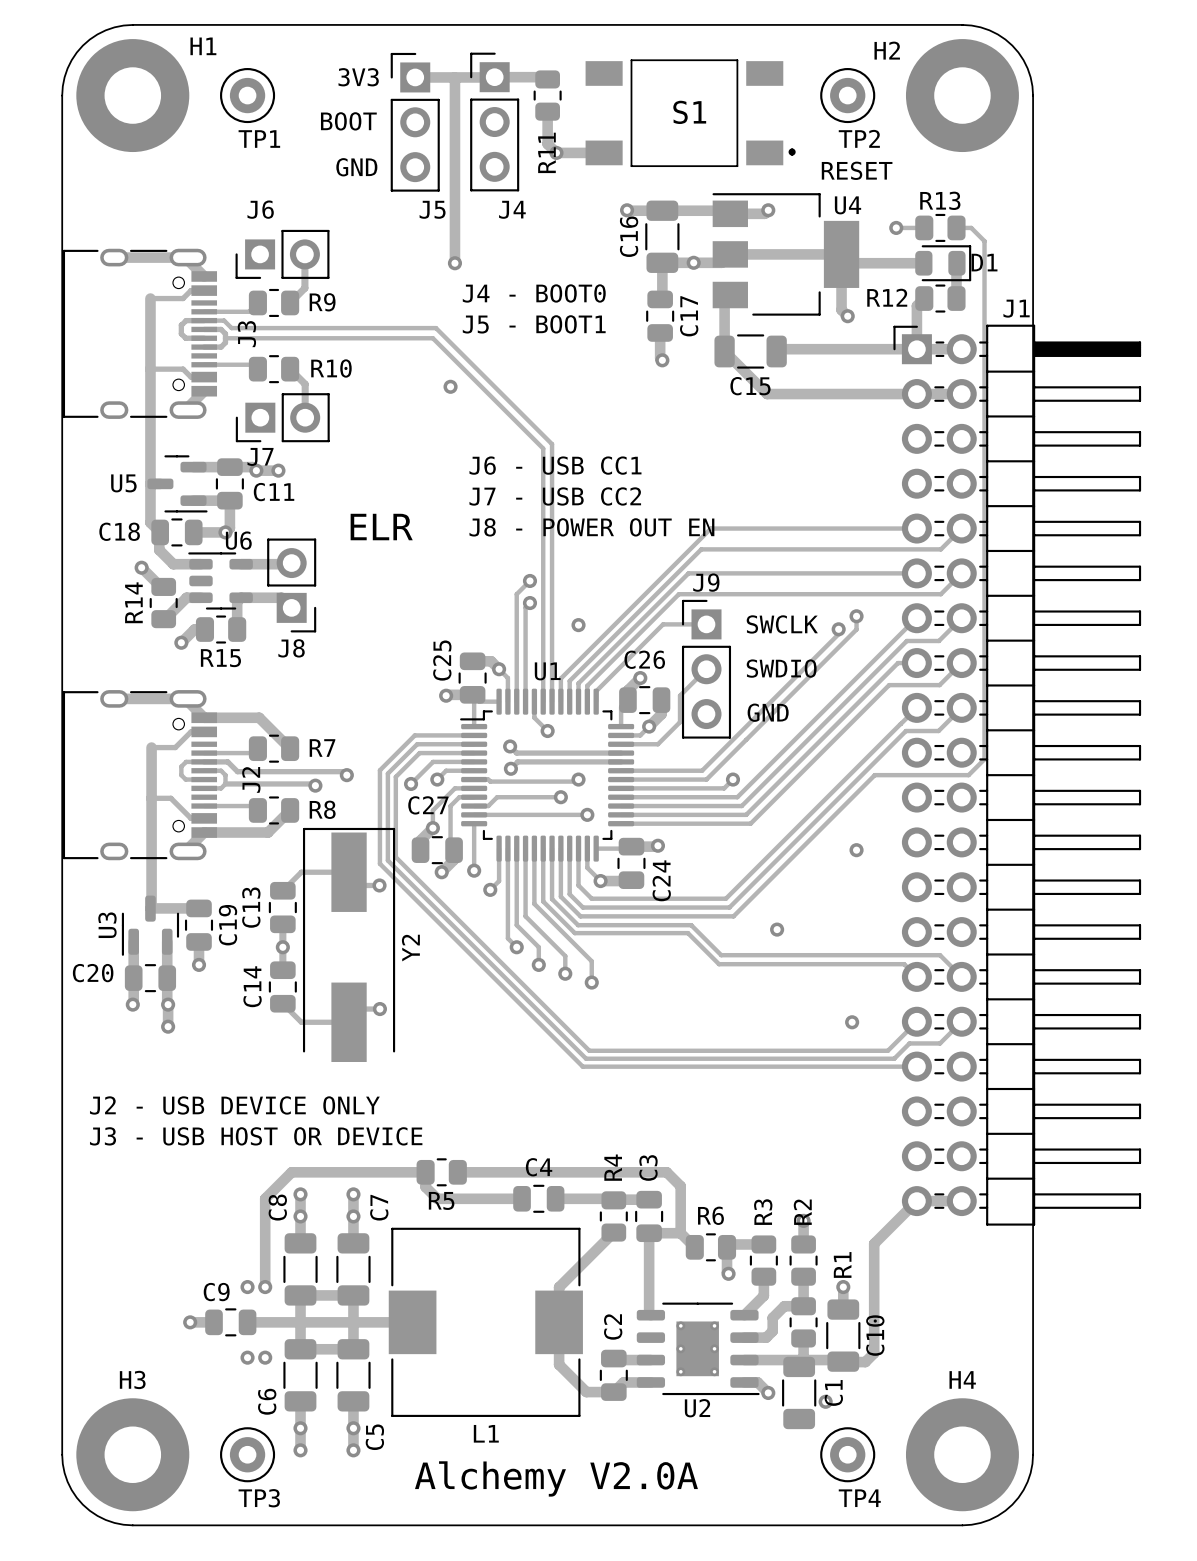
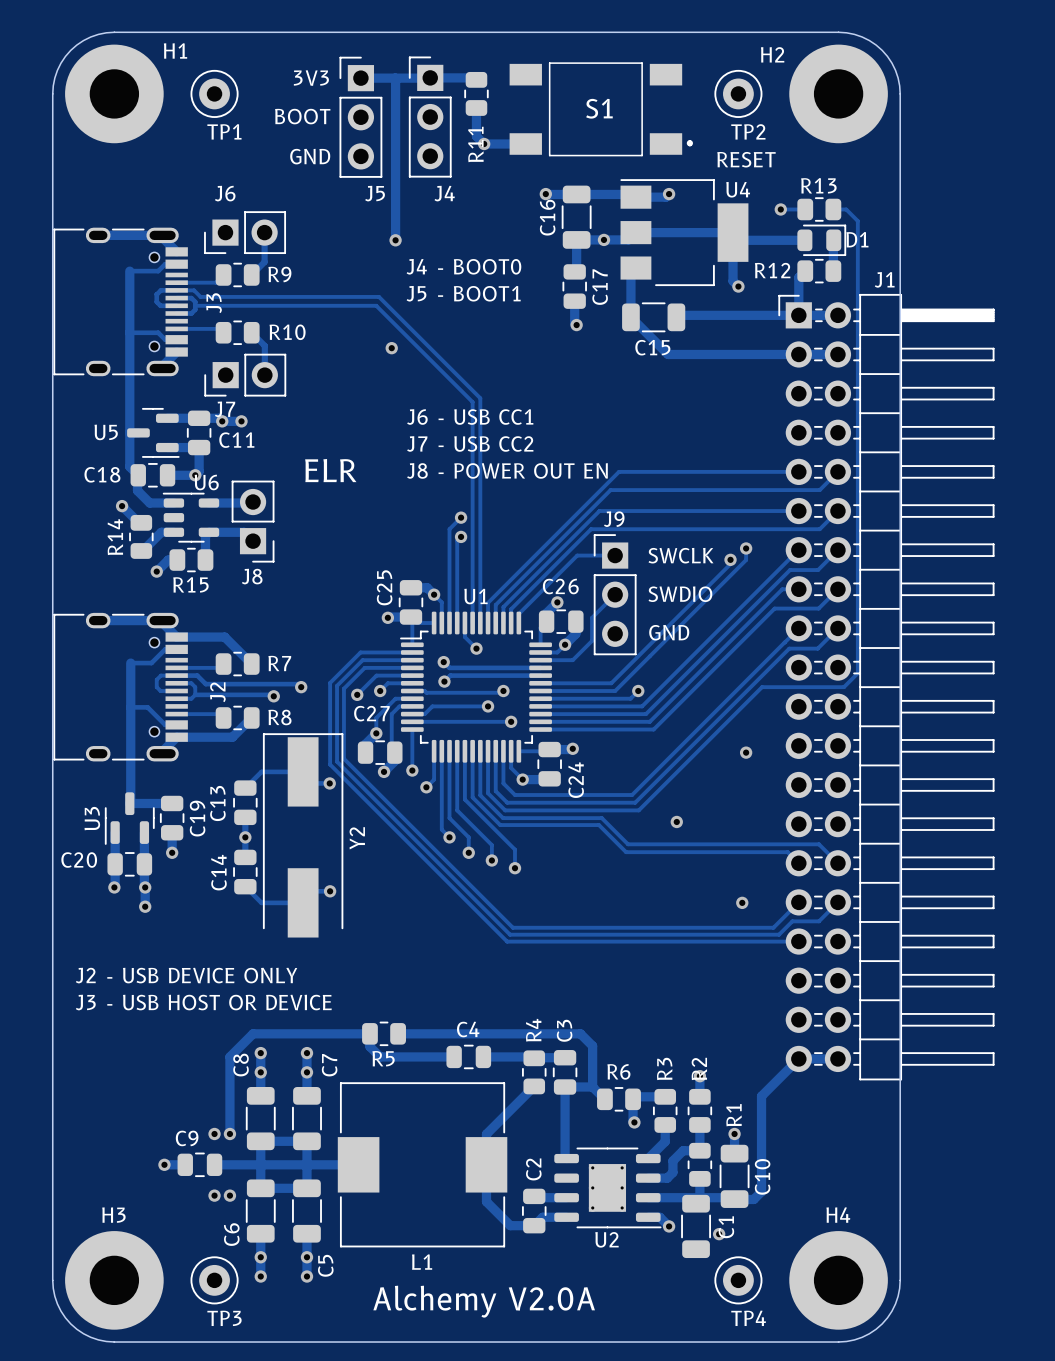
via: (578, 625) -> none

